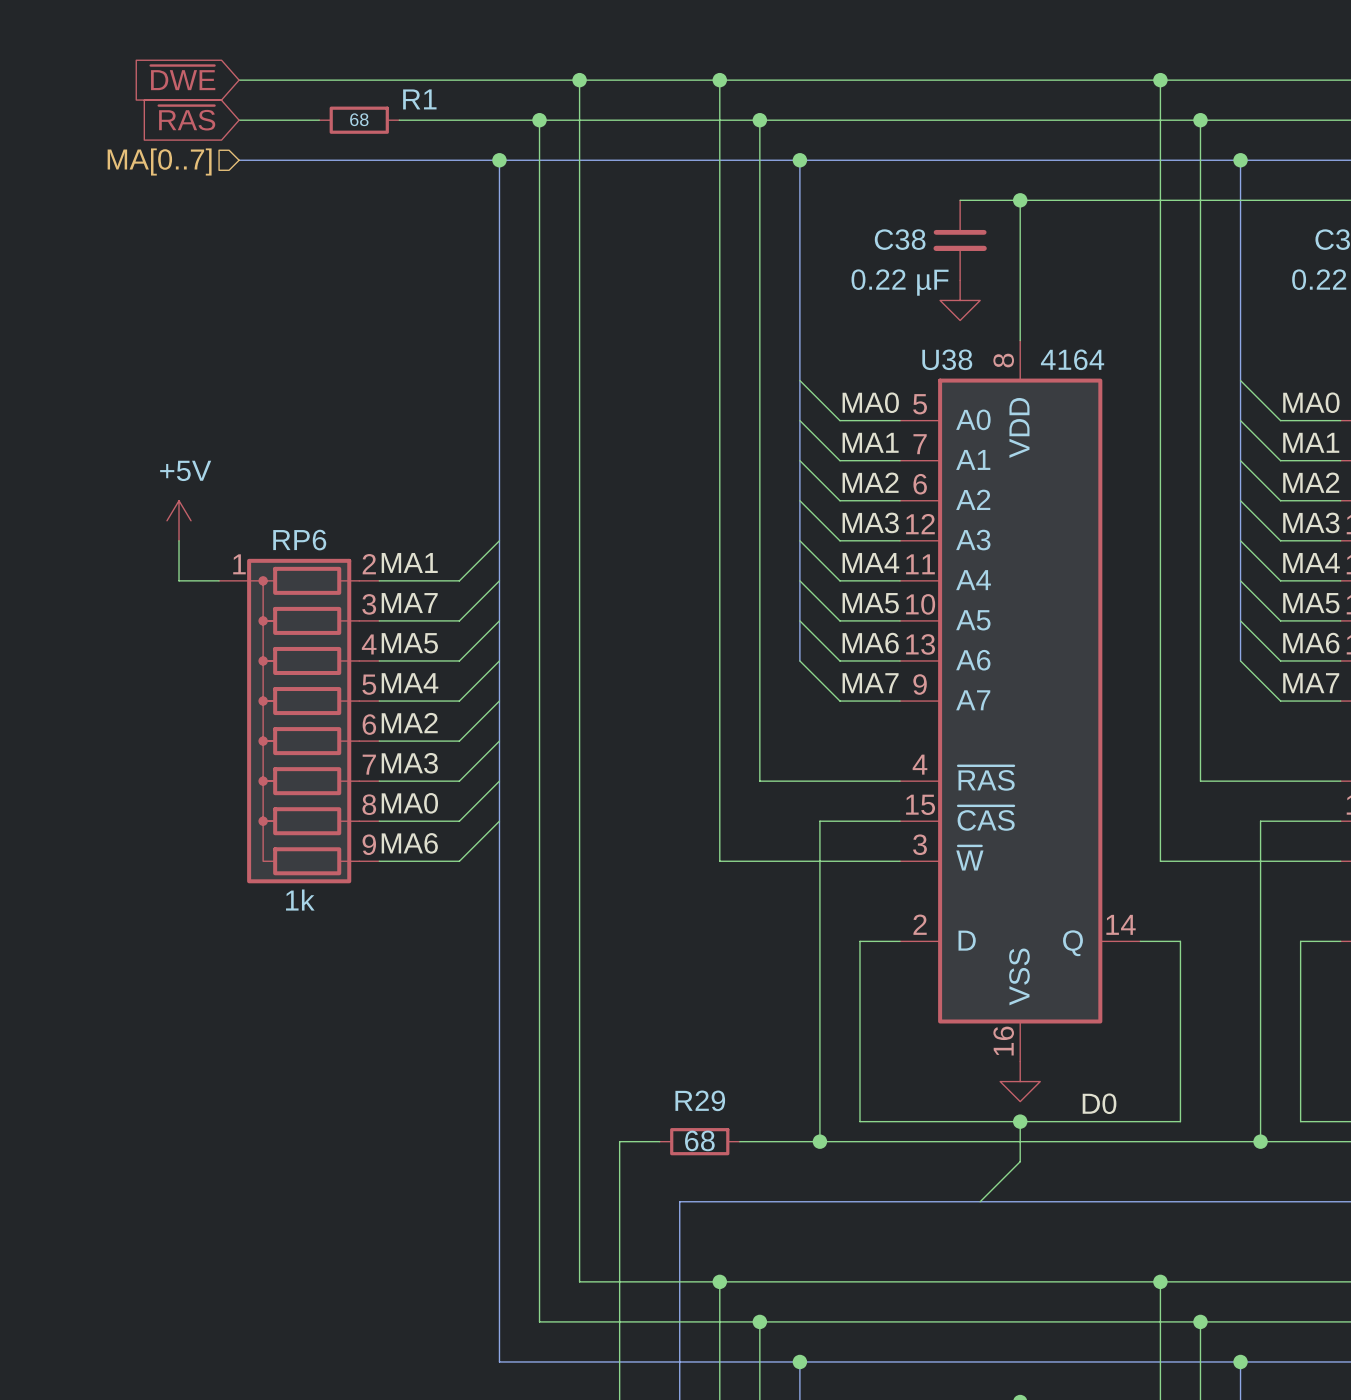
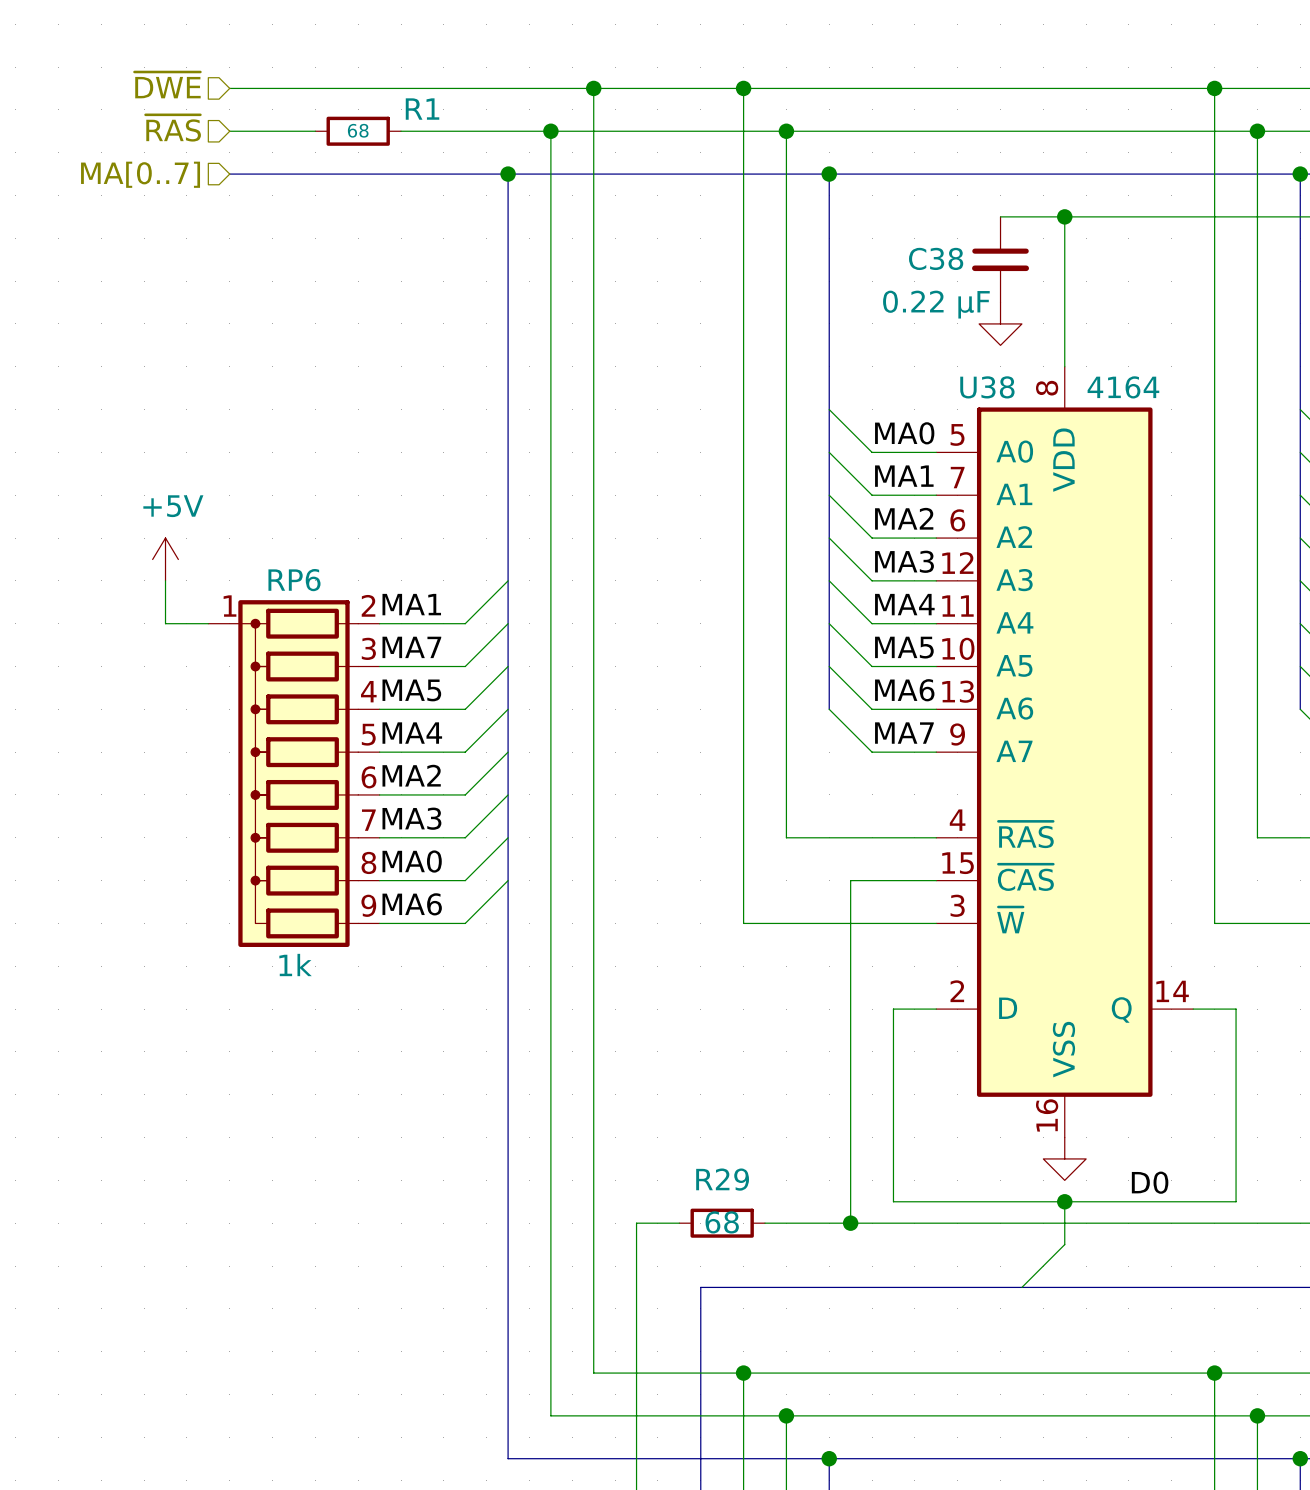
hierarchical label: none -> ~{DWE} (167, 85)
global label: ~{DWE} (182, 77) -> none
hierarchical label: none -> ~{RAS} (173, 128)
global label: ~{RAS} (186, 118) -> none

